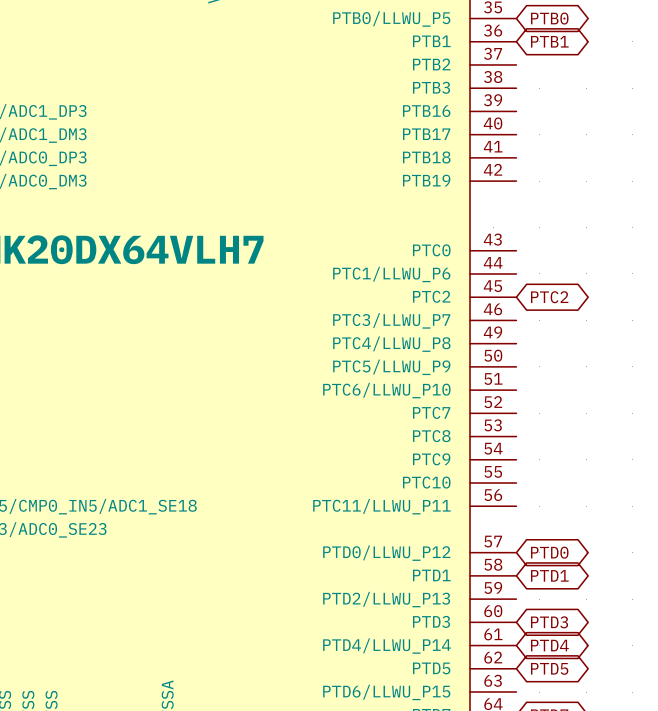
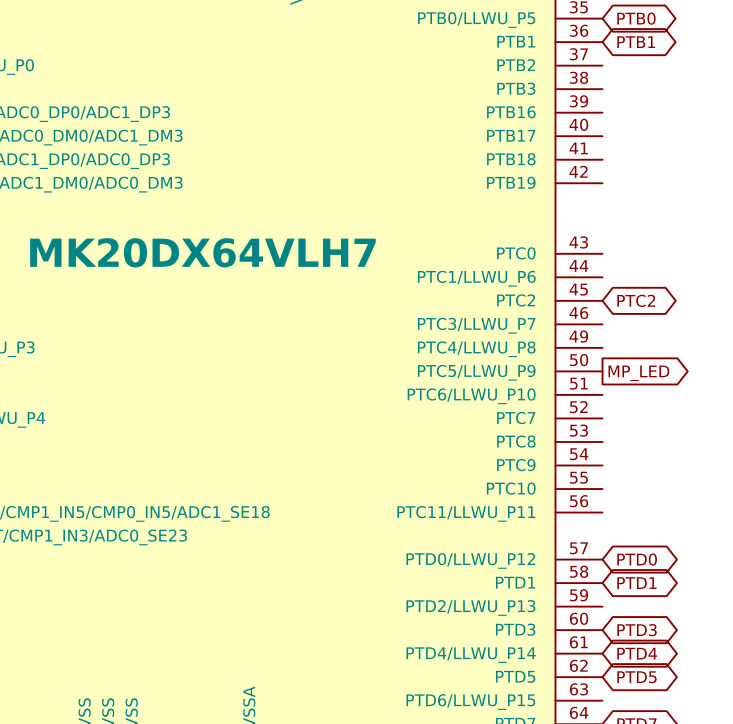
global label: none -> MP_LED (638, 373)

